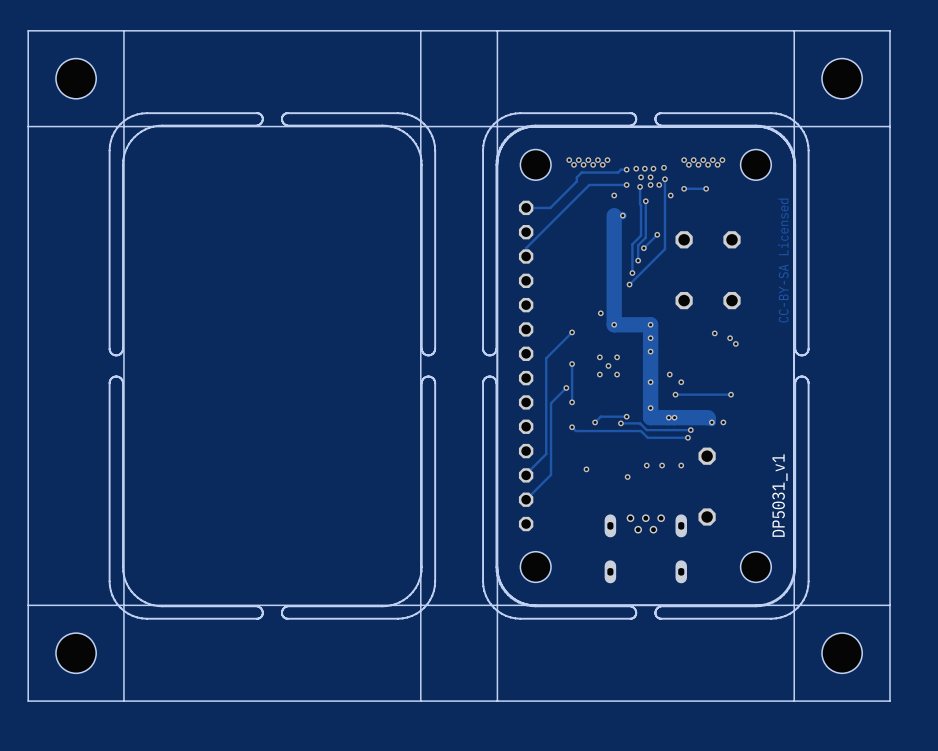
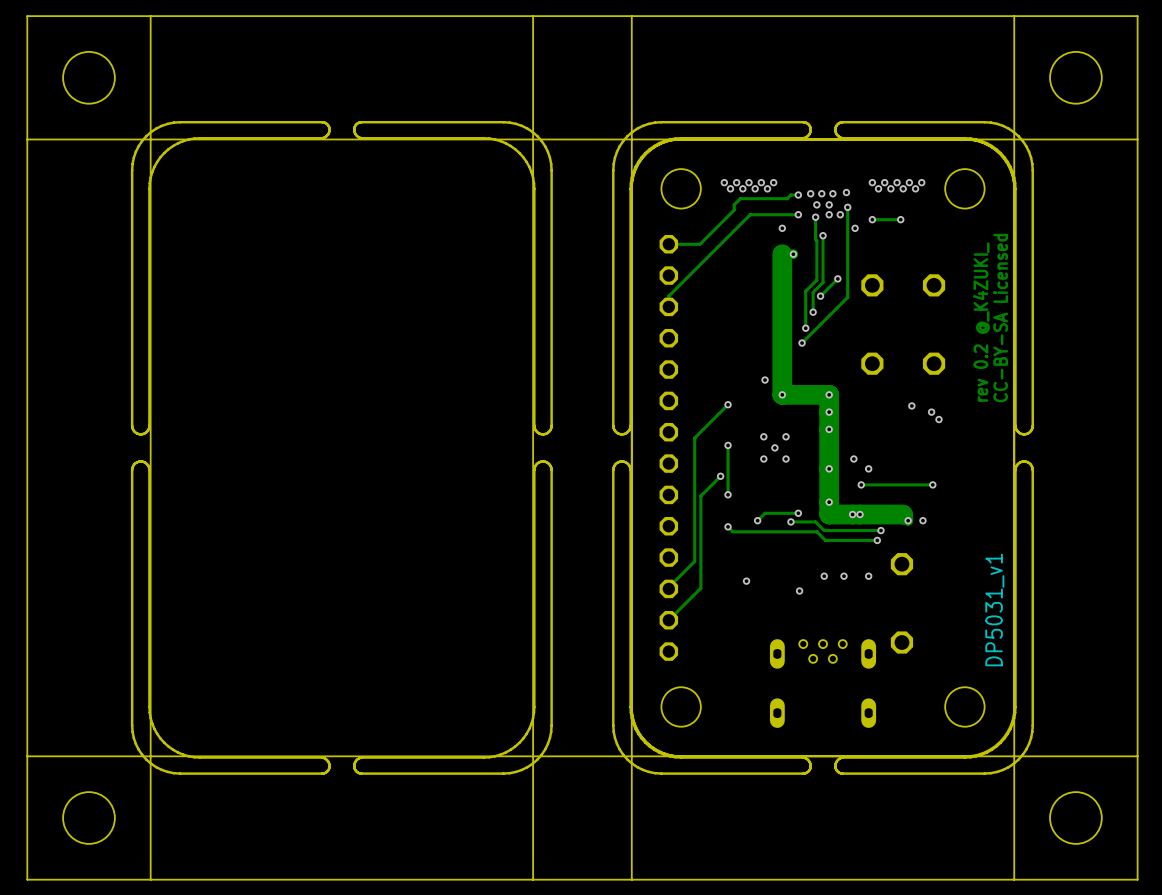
text: none -> rev 0.2 @_K4ZUKI_ (981, 321)

